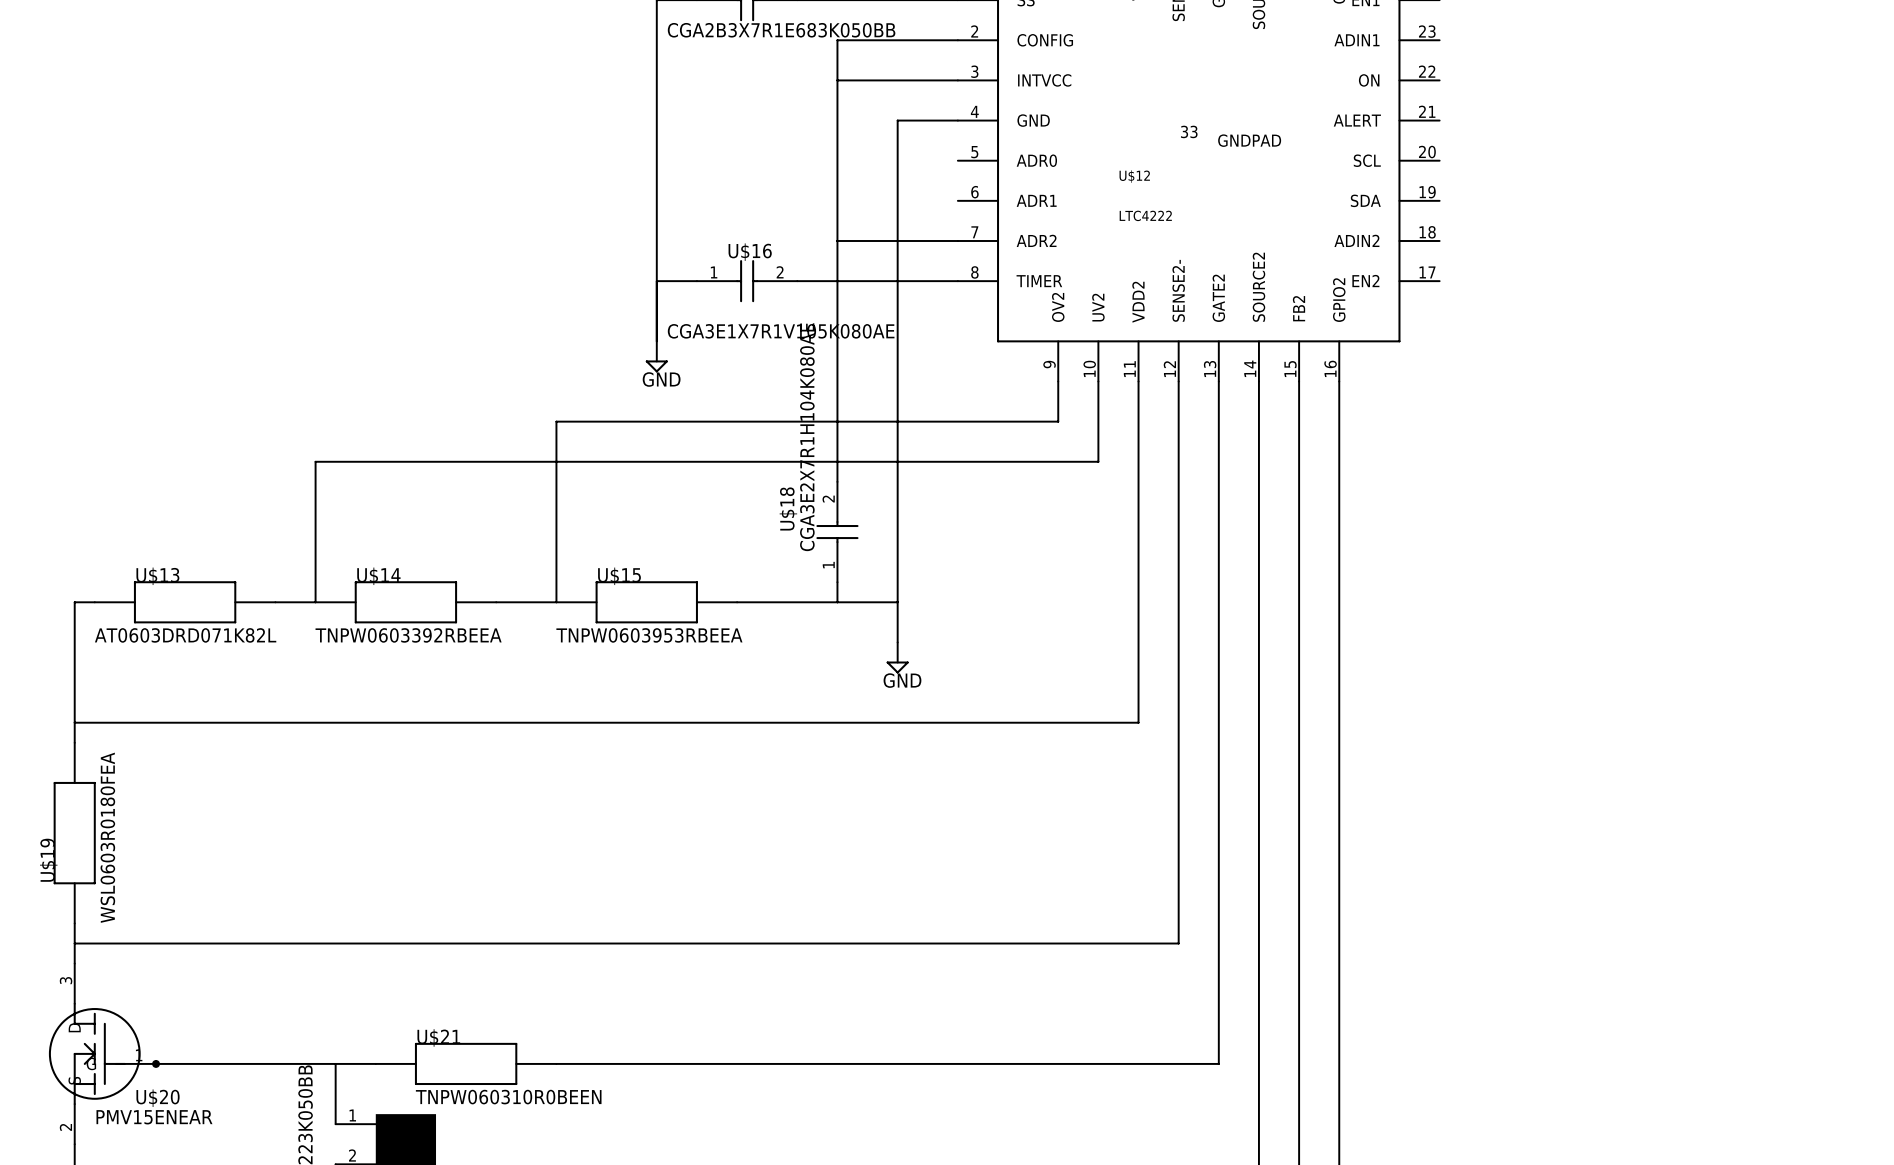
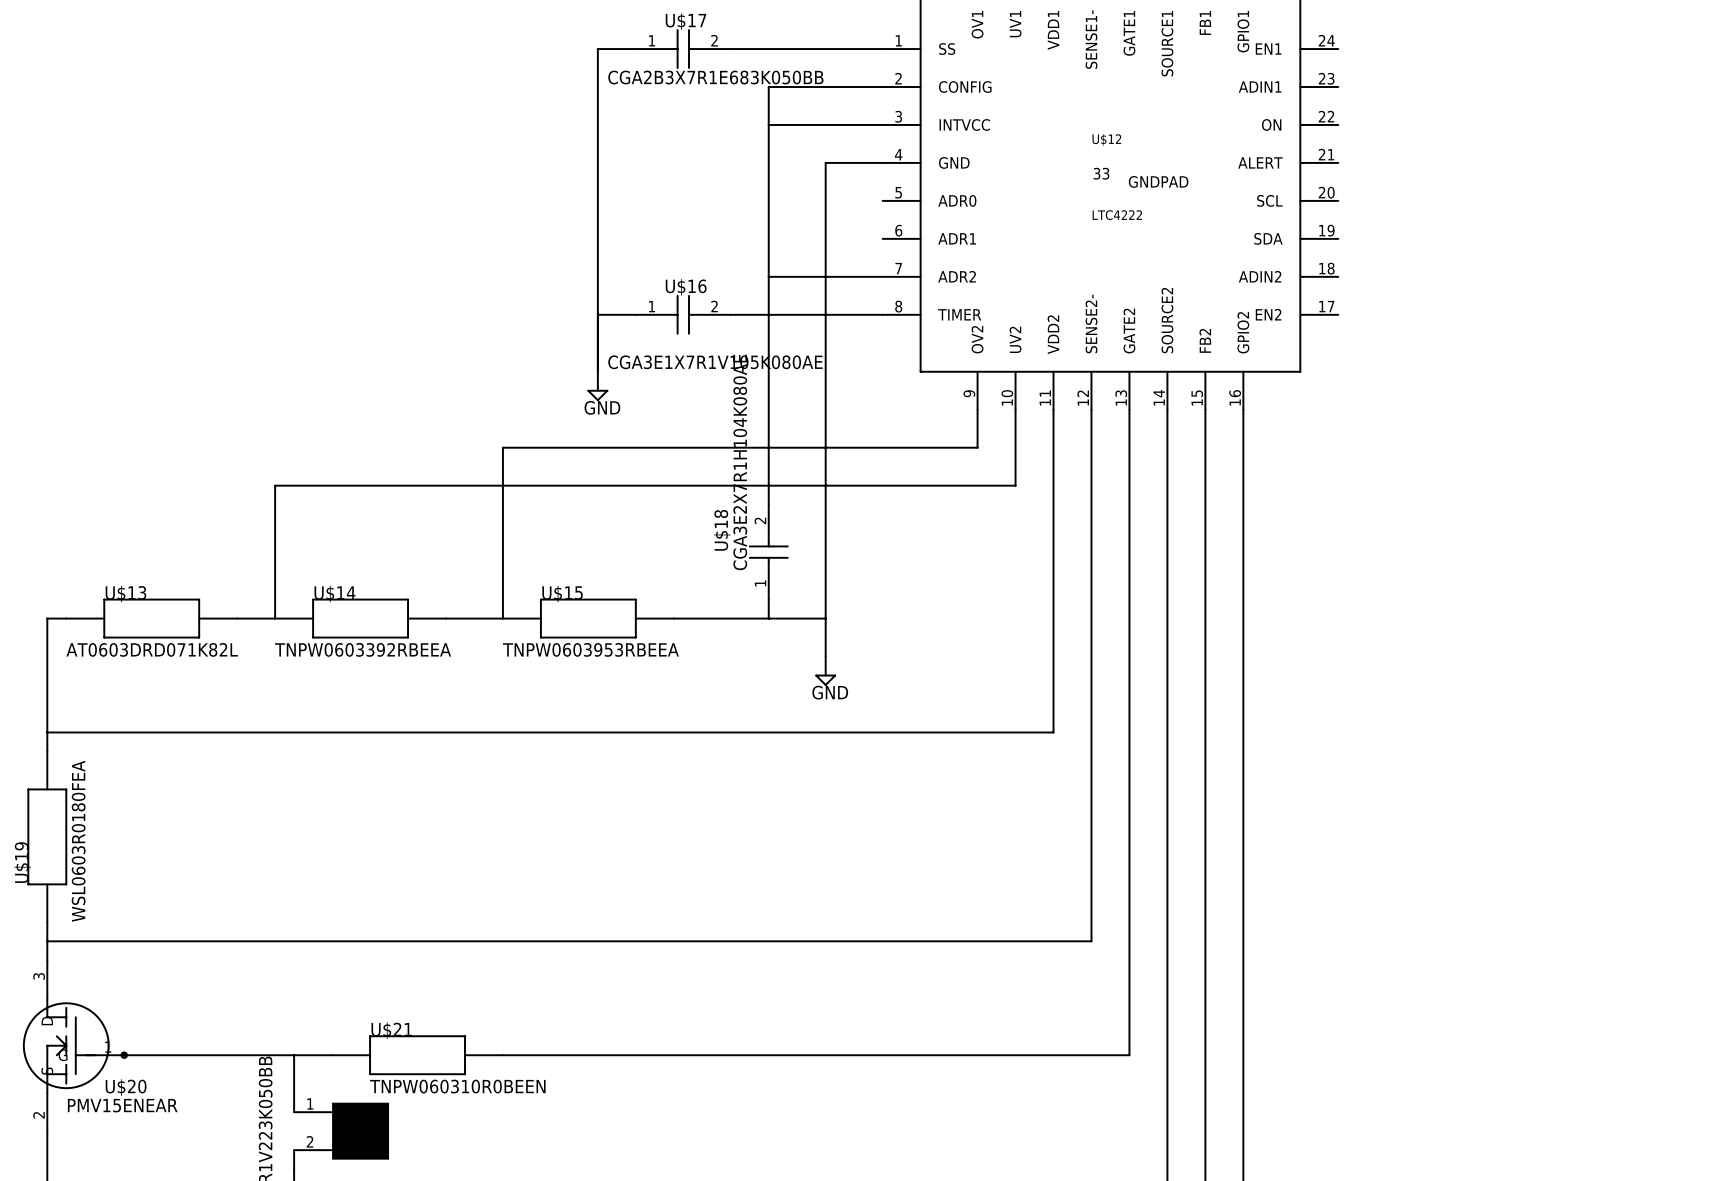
U$12 name position: U$12 (1134, 176) -> U$12 (1106, 139)
U$12 value position: LTC4222 (1145, 215) -> LTC4222 (1117, 215)

